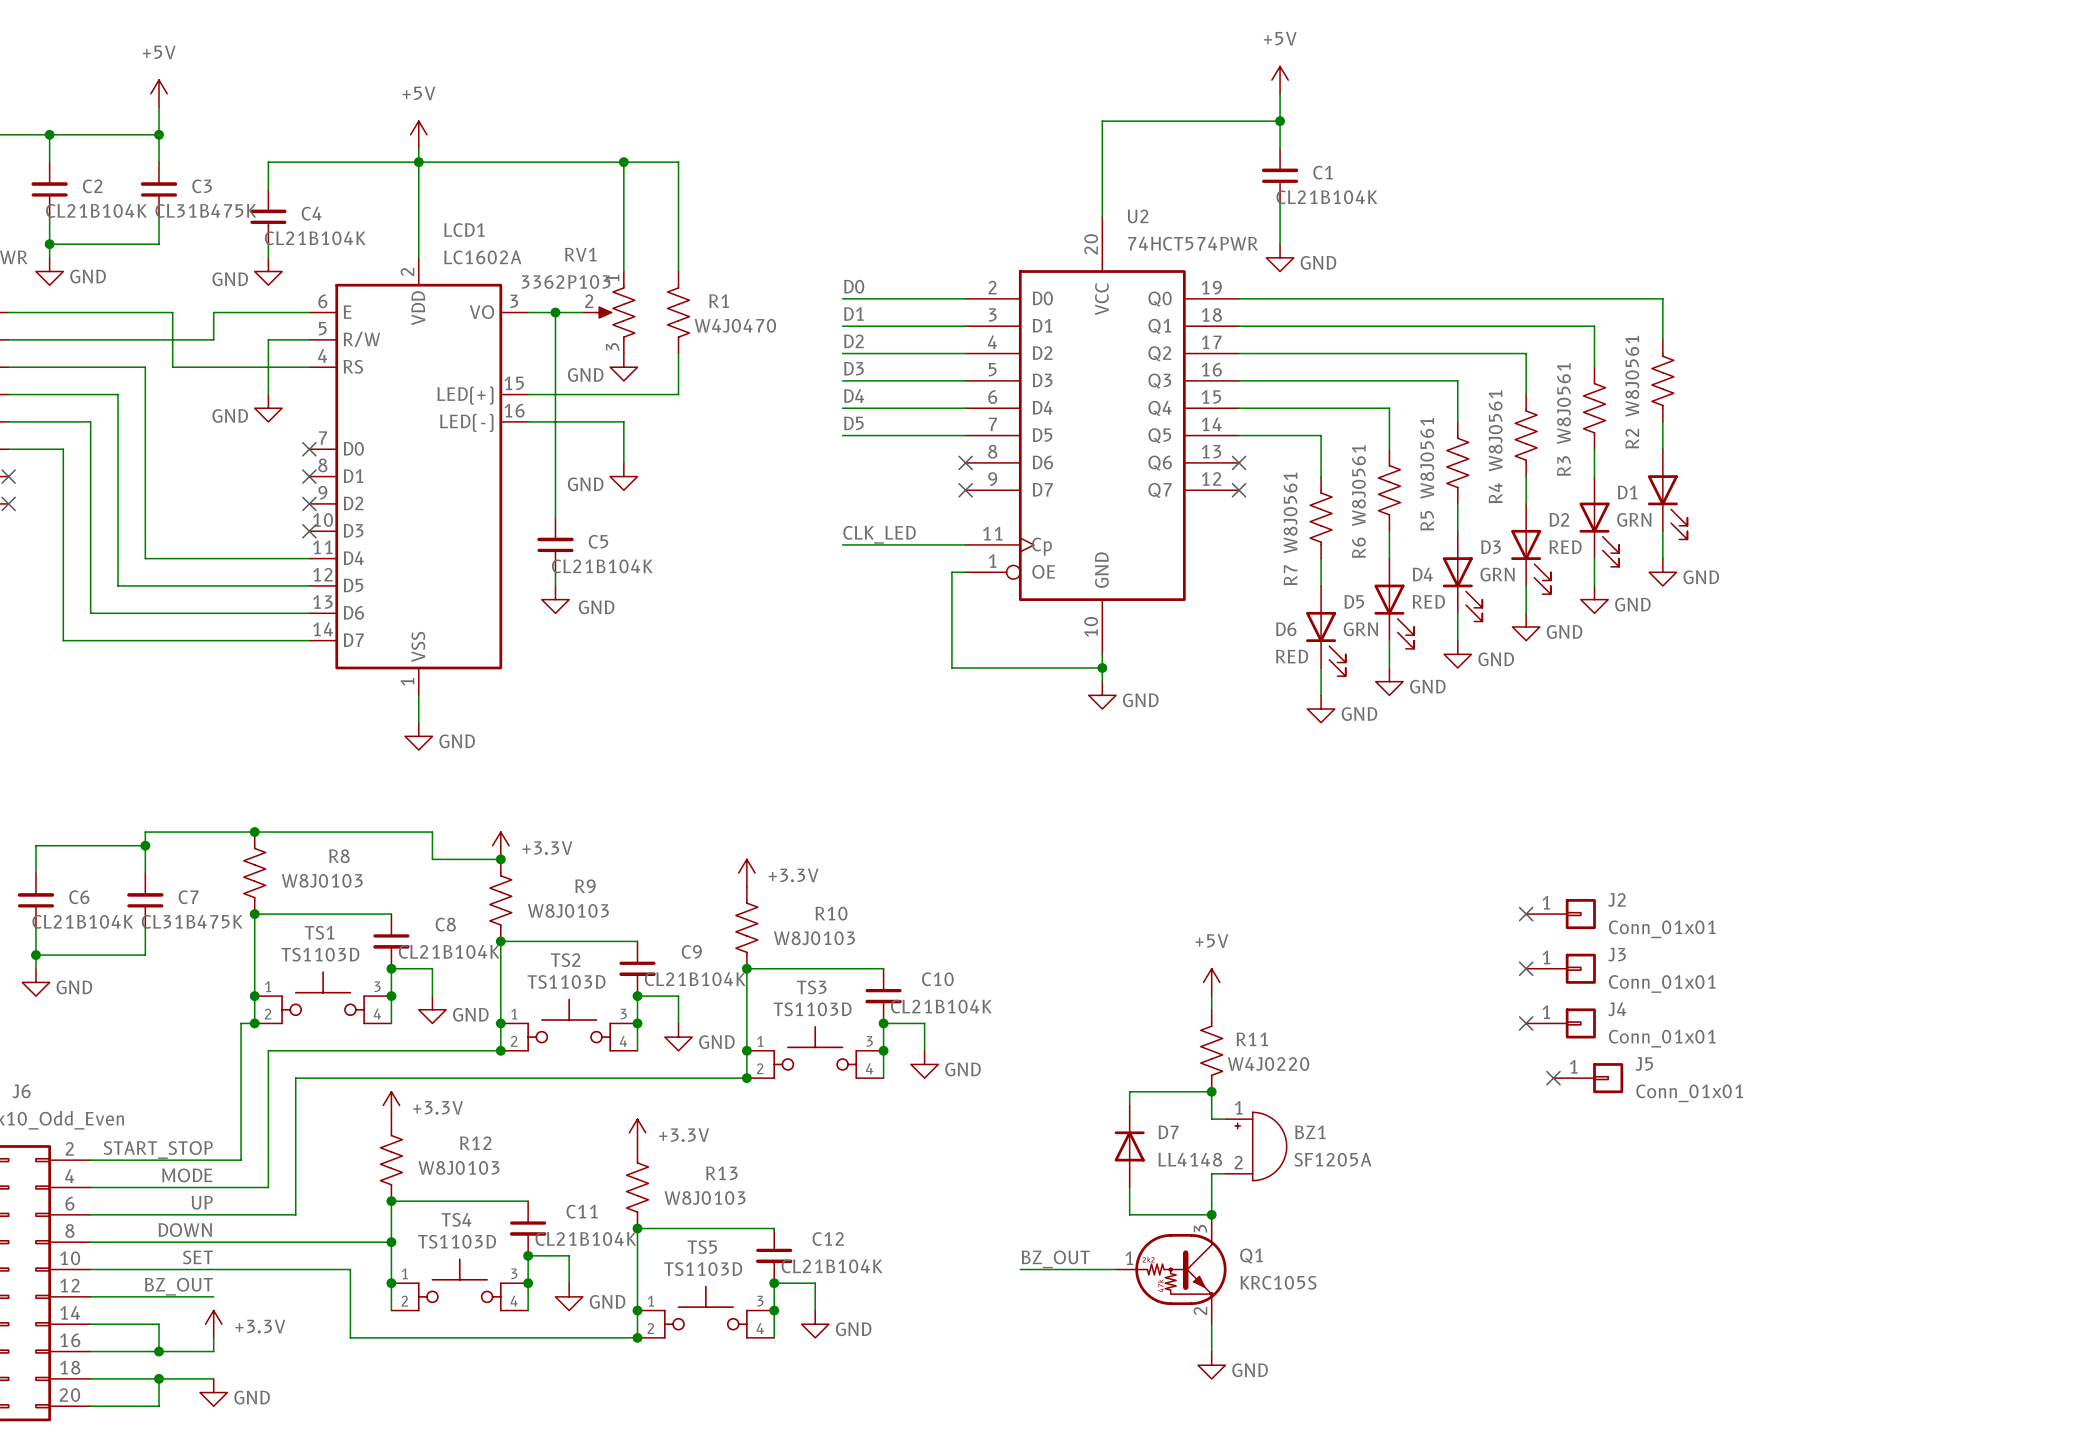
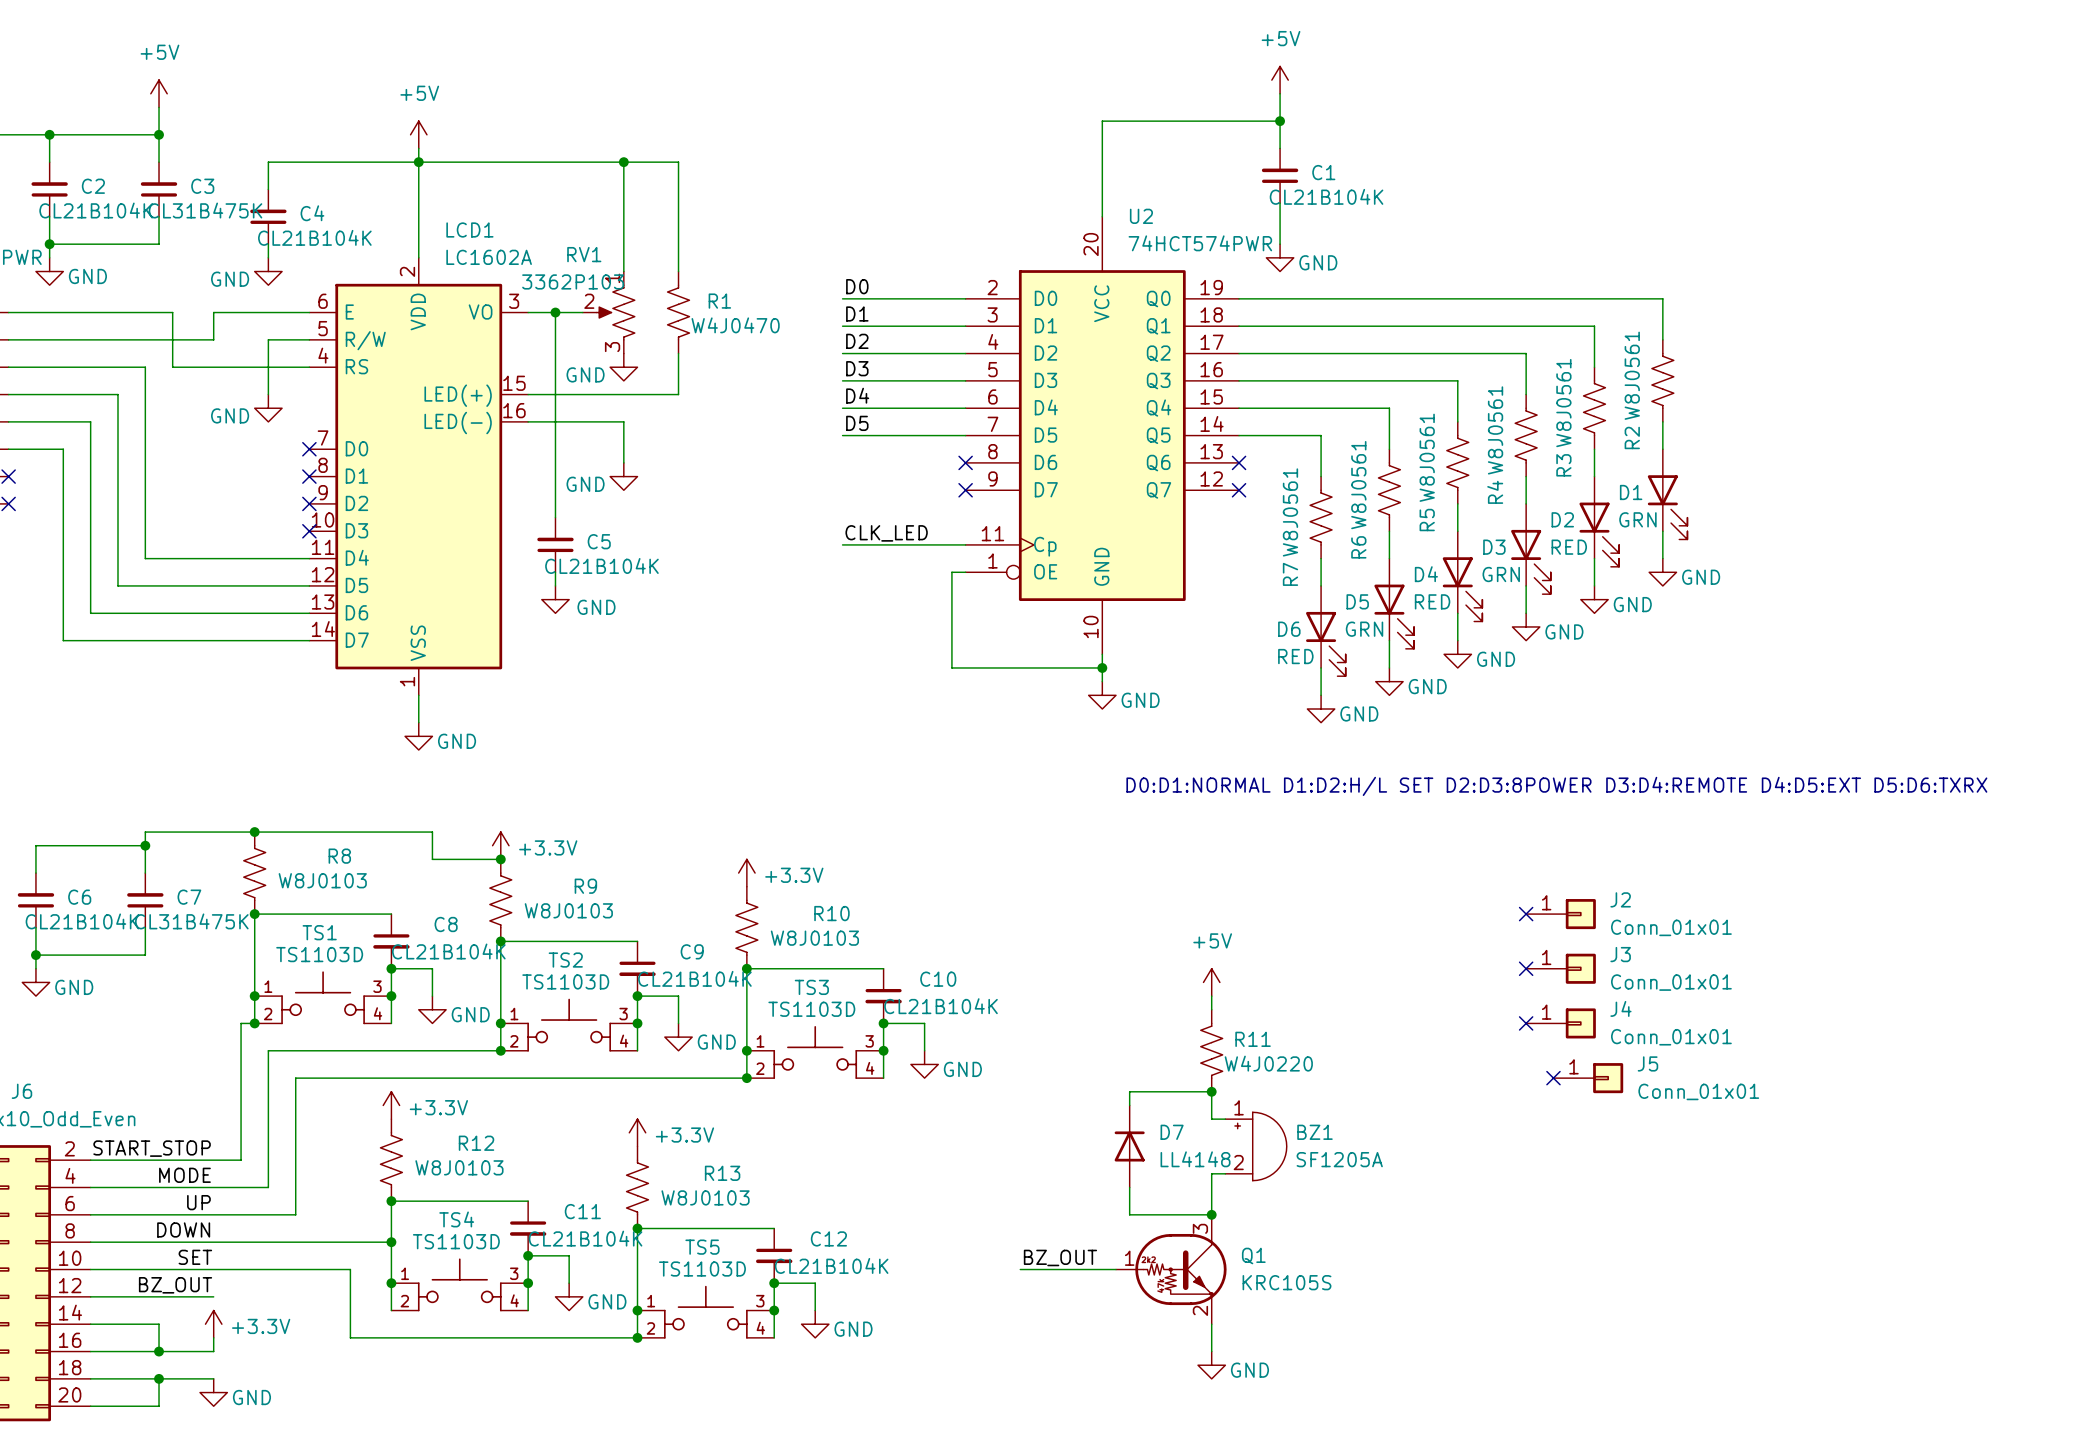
text: none -> D0:D1:NORMAL D1:D2:H/L SET D2:D3:8POWER D3:D4:REMOTE D4:D5:EXT D5:D6:TXRX (1556, 786)

